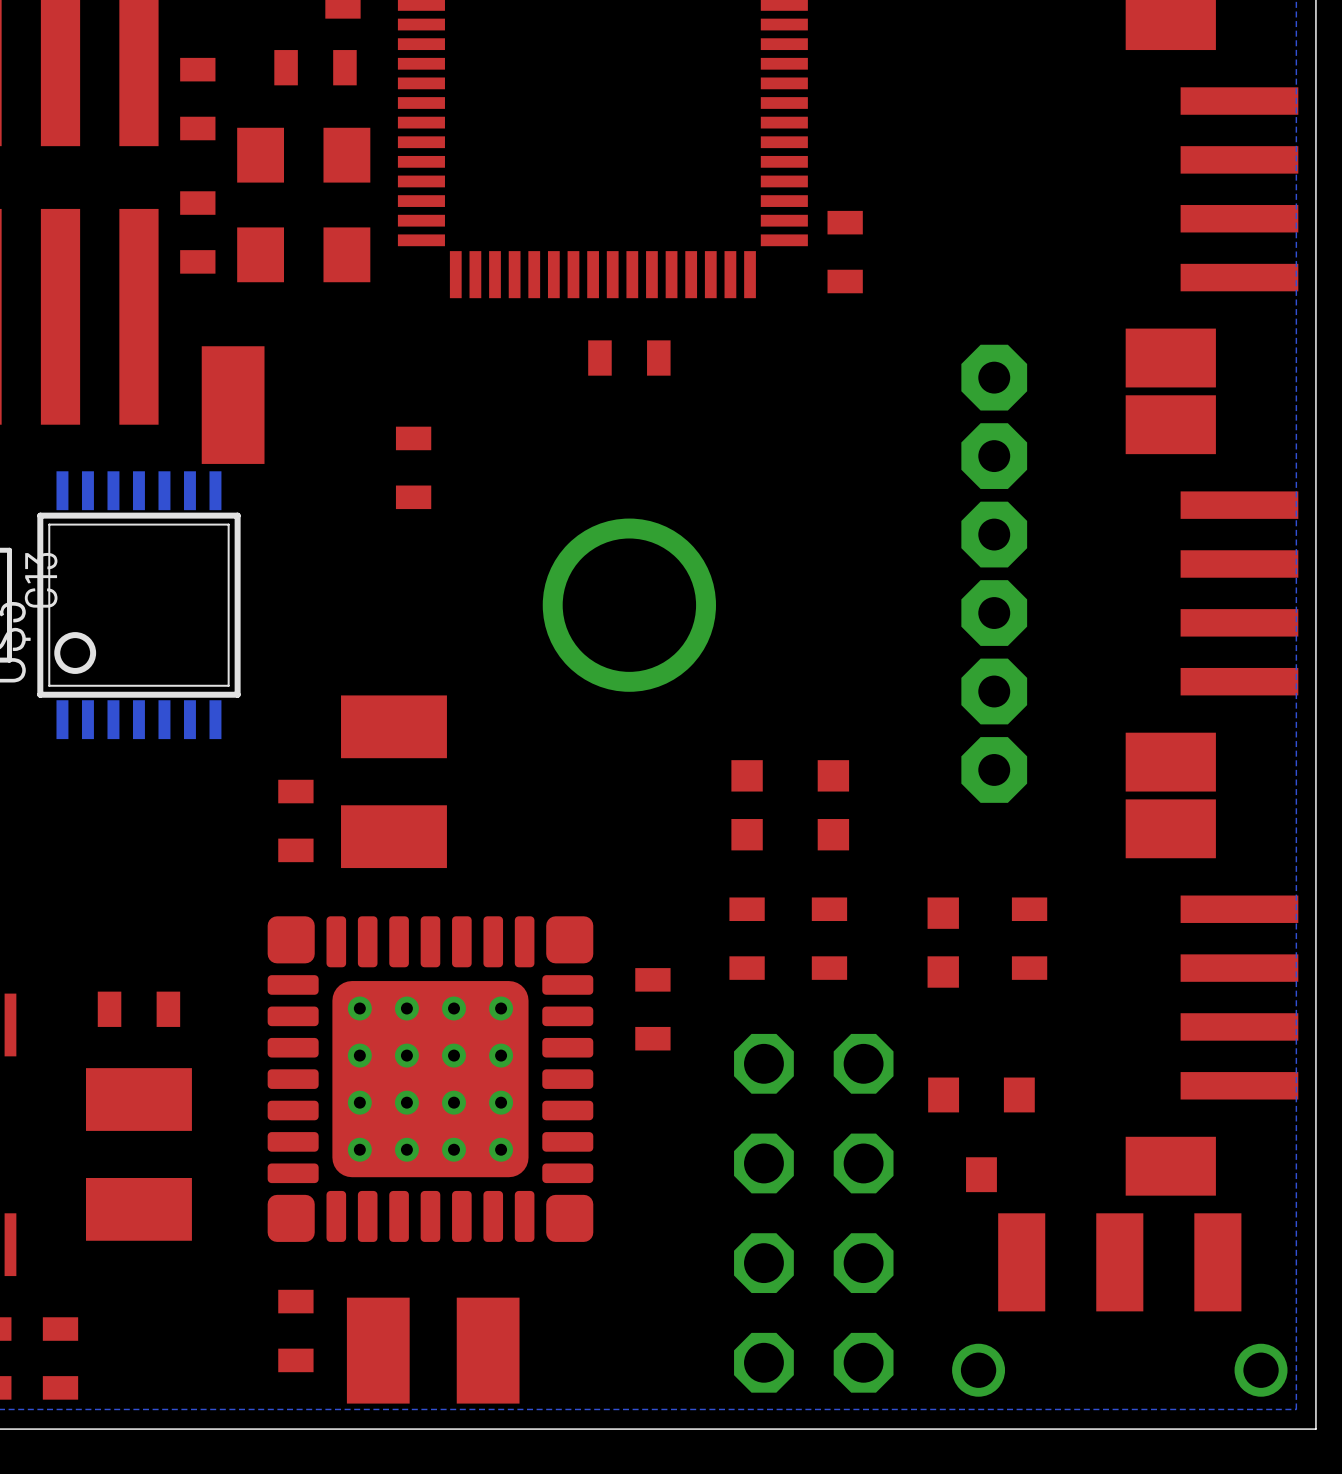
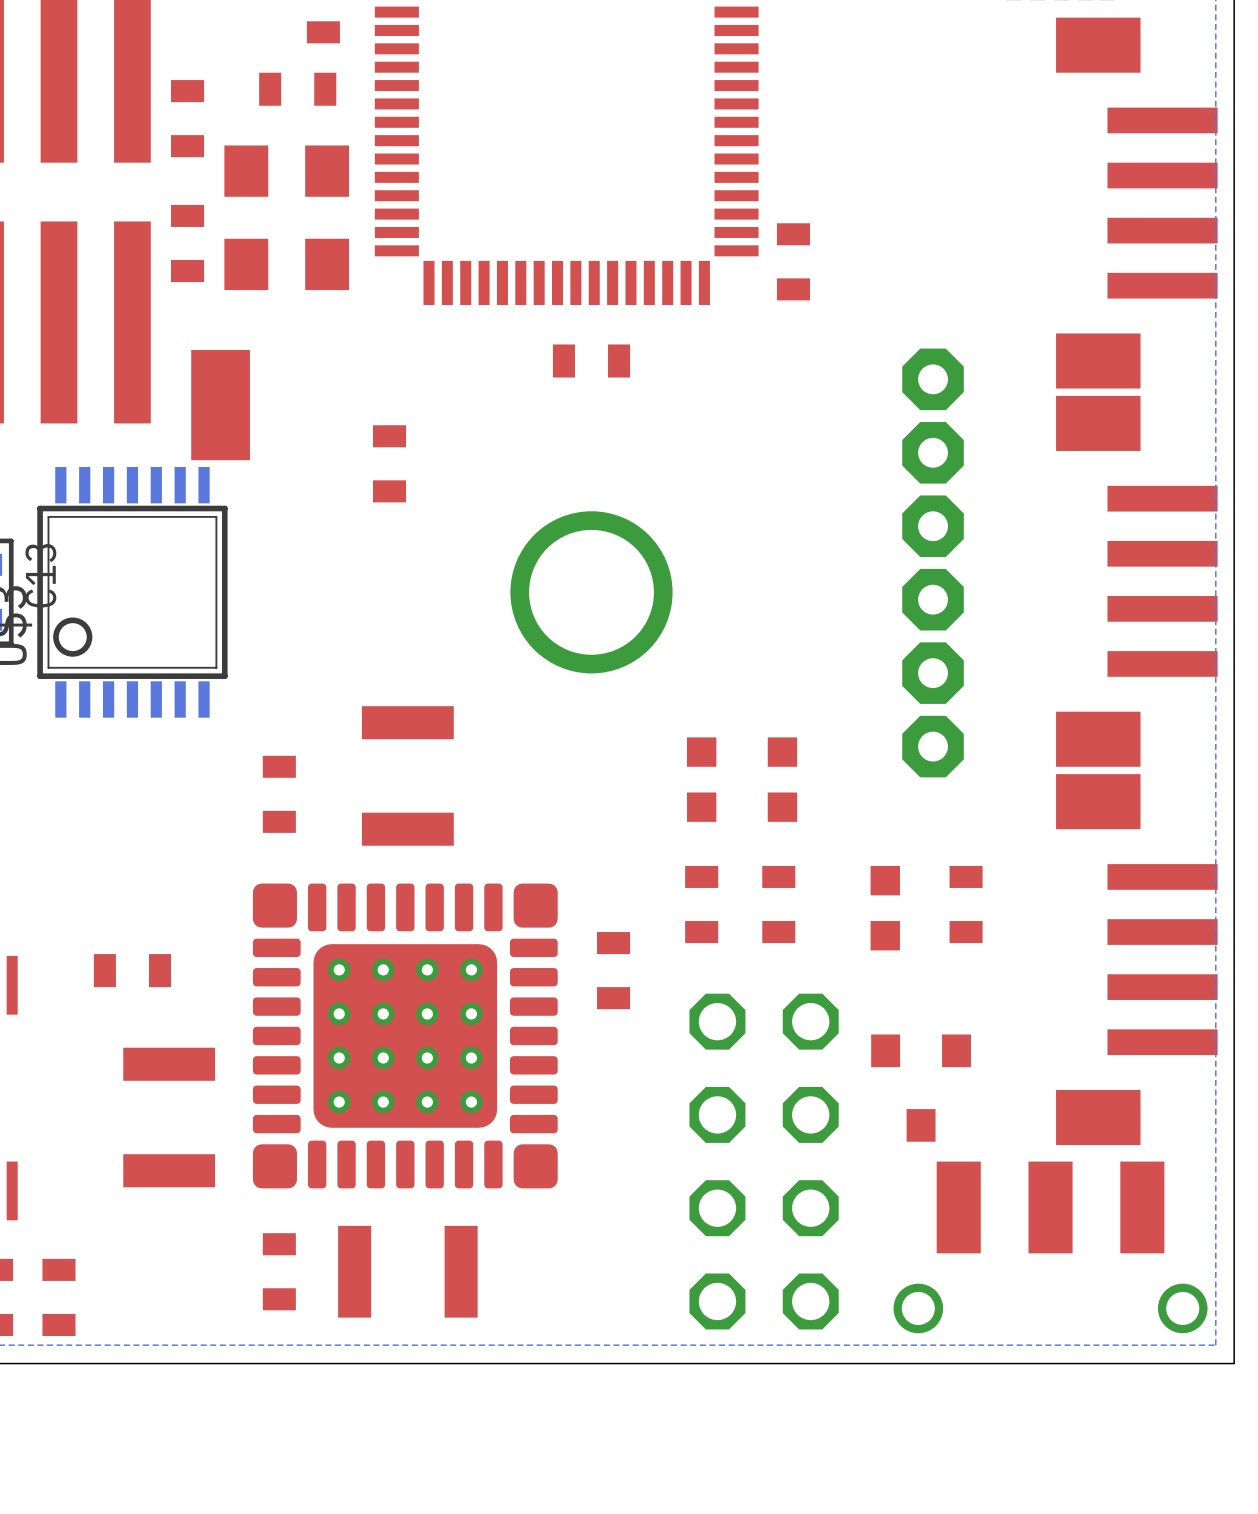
part: (393, 781) -> none
part: none -> (407, 775)
part: (138, 1154) -> none
part: none -> (169, 1117)
part footprint: [346, 1297, 520, 1404] -> [338, 1225, 478, 1318]

